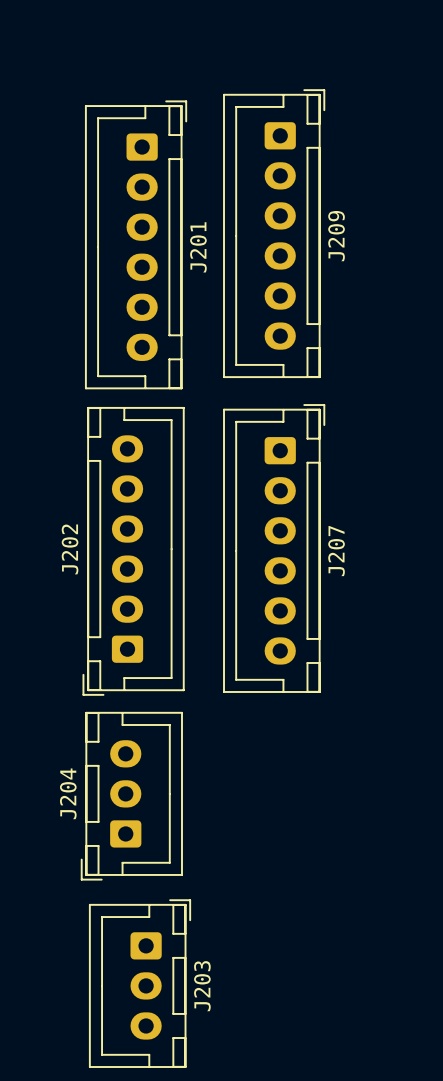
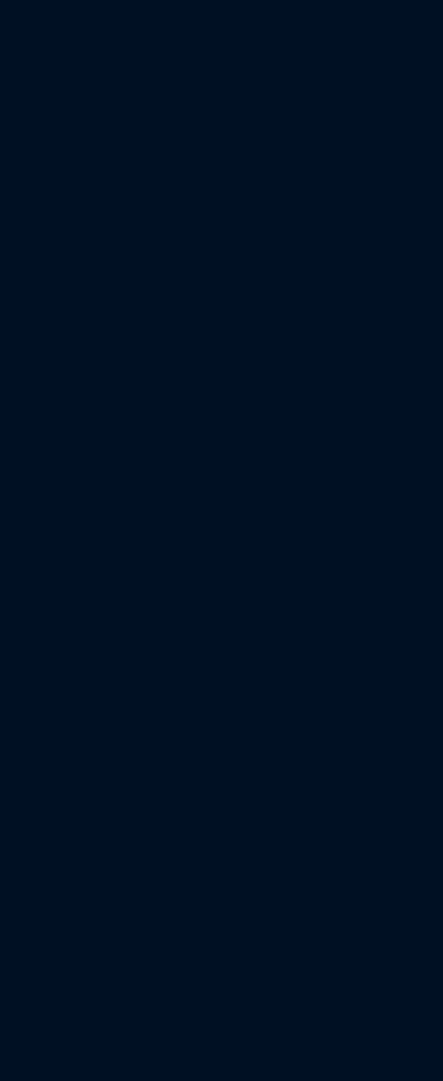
J209: (274, 233) -> none
J201: (136, 244) -> none
J207: (274, 548) -> none
J202: (133, 551) -> none
J204: (131, 796) -> none
J203: (140, 983) -> none

